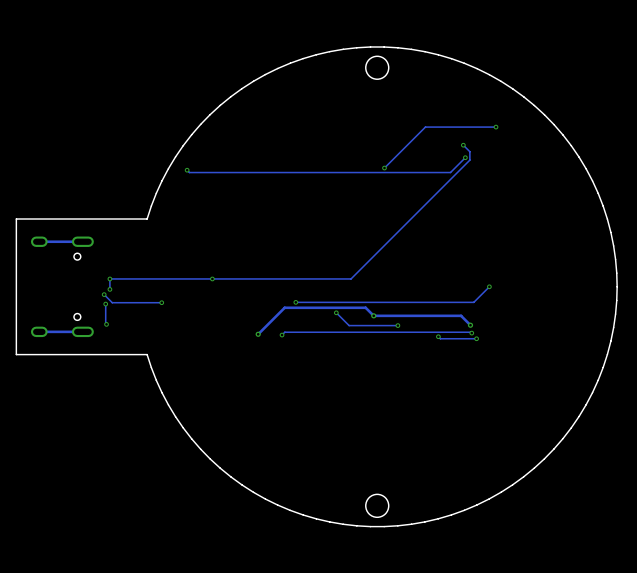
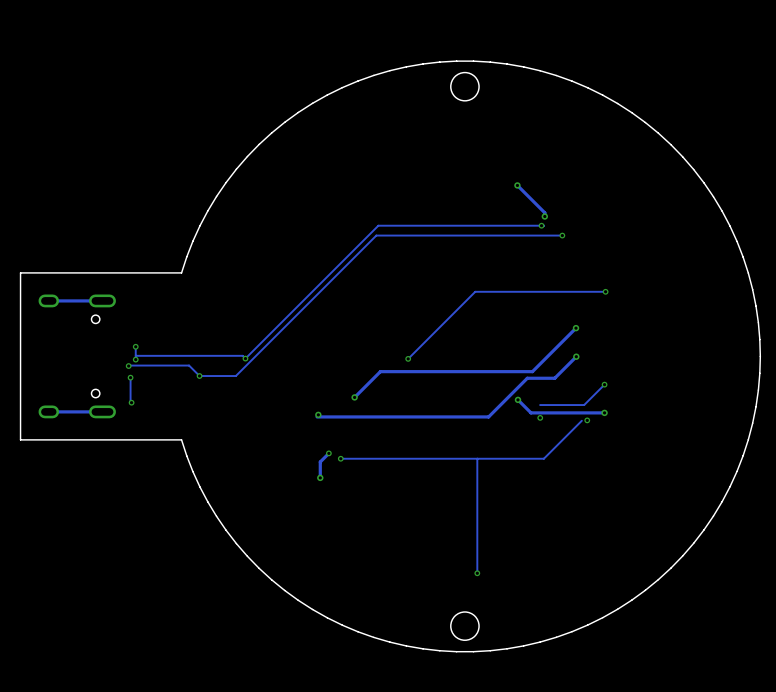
track: (496, 127) (425, 127) (384, 168) -> none
via: (496, 127) -> none
track: (463, 145) (469, 151) (469, 160) (351, 278) (109, 278) -> none
via: (463, 145) -> none
track: none -> (517, 185) (544, 212) (544, 216)
via: none -> (517, 185)
track: (465, 157) (450, 172) (189, 172) (187, 170) -> none
via: (465, 157) -> none
via: (384, 168) -> none
via: (187, 170) -> none
via: none -> (544, 216)
via: none -> (541, 225)
track: none -> (544, 225) (378, 225) (245, 358) (242, 355) (135, 355)
track: none -> (562, 235) (376, 235) (235, 376) (199, 376) (189, 365) (128, 365)
via: none -> (562, 235)
track: none -> (605, 291) (475, 291) (408, 358)
via: none -> (605, 291)
track: none -> (576, 328) (532, 371) (380, 371) (354, 397)
via: none -> (576, 328)
via position: (212, 278) -> (245, 358)
track: (489, 286) (473, 302) (295, 302) -> none
via: (489, 286) -> none
track: none -> (576, 356) (554, 378) (527, 378) (488, 416) (317, 416)
via: none -> (576, 356)
via: none -> (408, 358)
track: (104, 294) (112, 302) (161, 302) -> none
via: (295, 302) -> none
track: none -> (604, 384) (584, 405) (540, 405)
via: none -> (604, 384)
track: (336, 312) (349, 325) (397, 325) -> none
via: (336, 312) -> none
via: (373, 315) -> none
via: none -> (354, 397)
track: none -> (517, 399) (530, 412) (604, 412)
via: none -> (517, 399)
via: (397, 325) -> none
track: (470, 325) (461, 315) (373, 315) (365, 307) (284, 307) (258, 334) -> none
via: (470, 325) -> none
via: none -> (604, 412)
track: (471, 333) (284, 332) (282, 335) -> none
via: (471, 333) -> none
via: (282, 335) -> none
track: (438, 336) (440, 338) (476, 338) -> none
track: none -> (581, 420) (543, 458) (340, 458)
track: none -> (328, 453) (320, 461) (320, 477)
via: none -> (328, 453)
via: none -> (340, 458)
track: none -> (477, 458) (477, 573)
via: none -> (320, 477)
via: none -> (477, 573)

